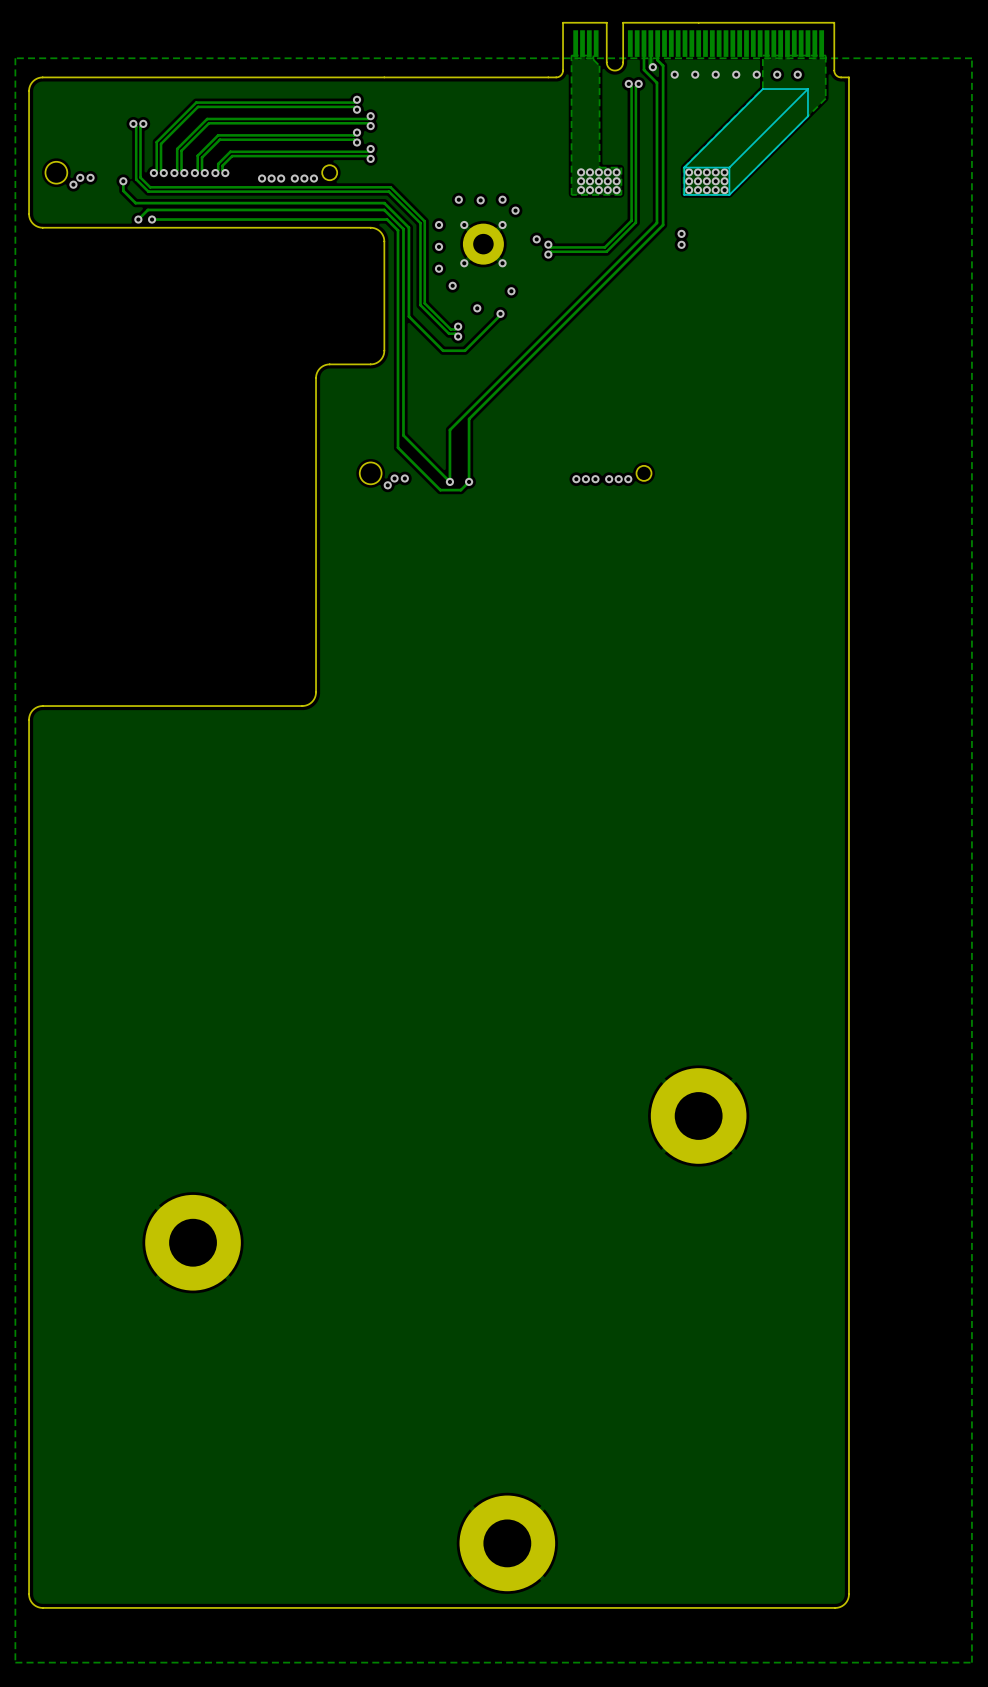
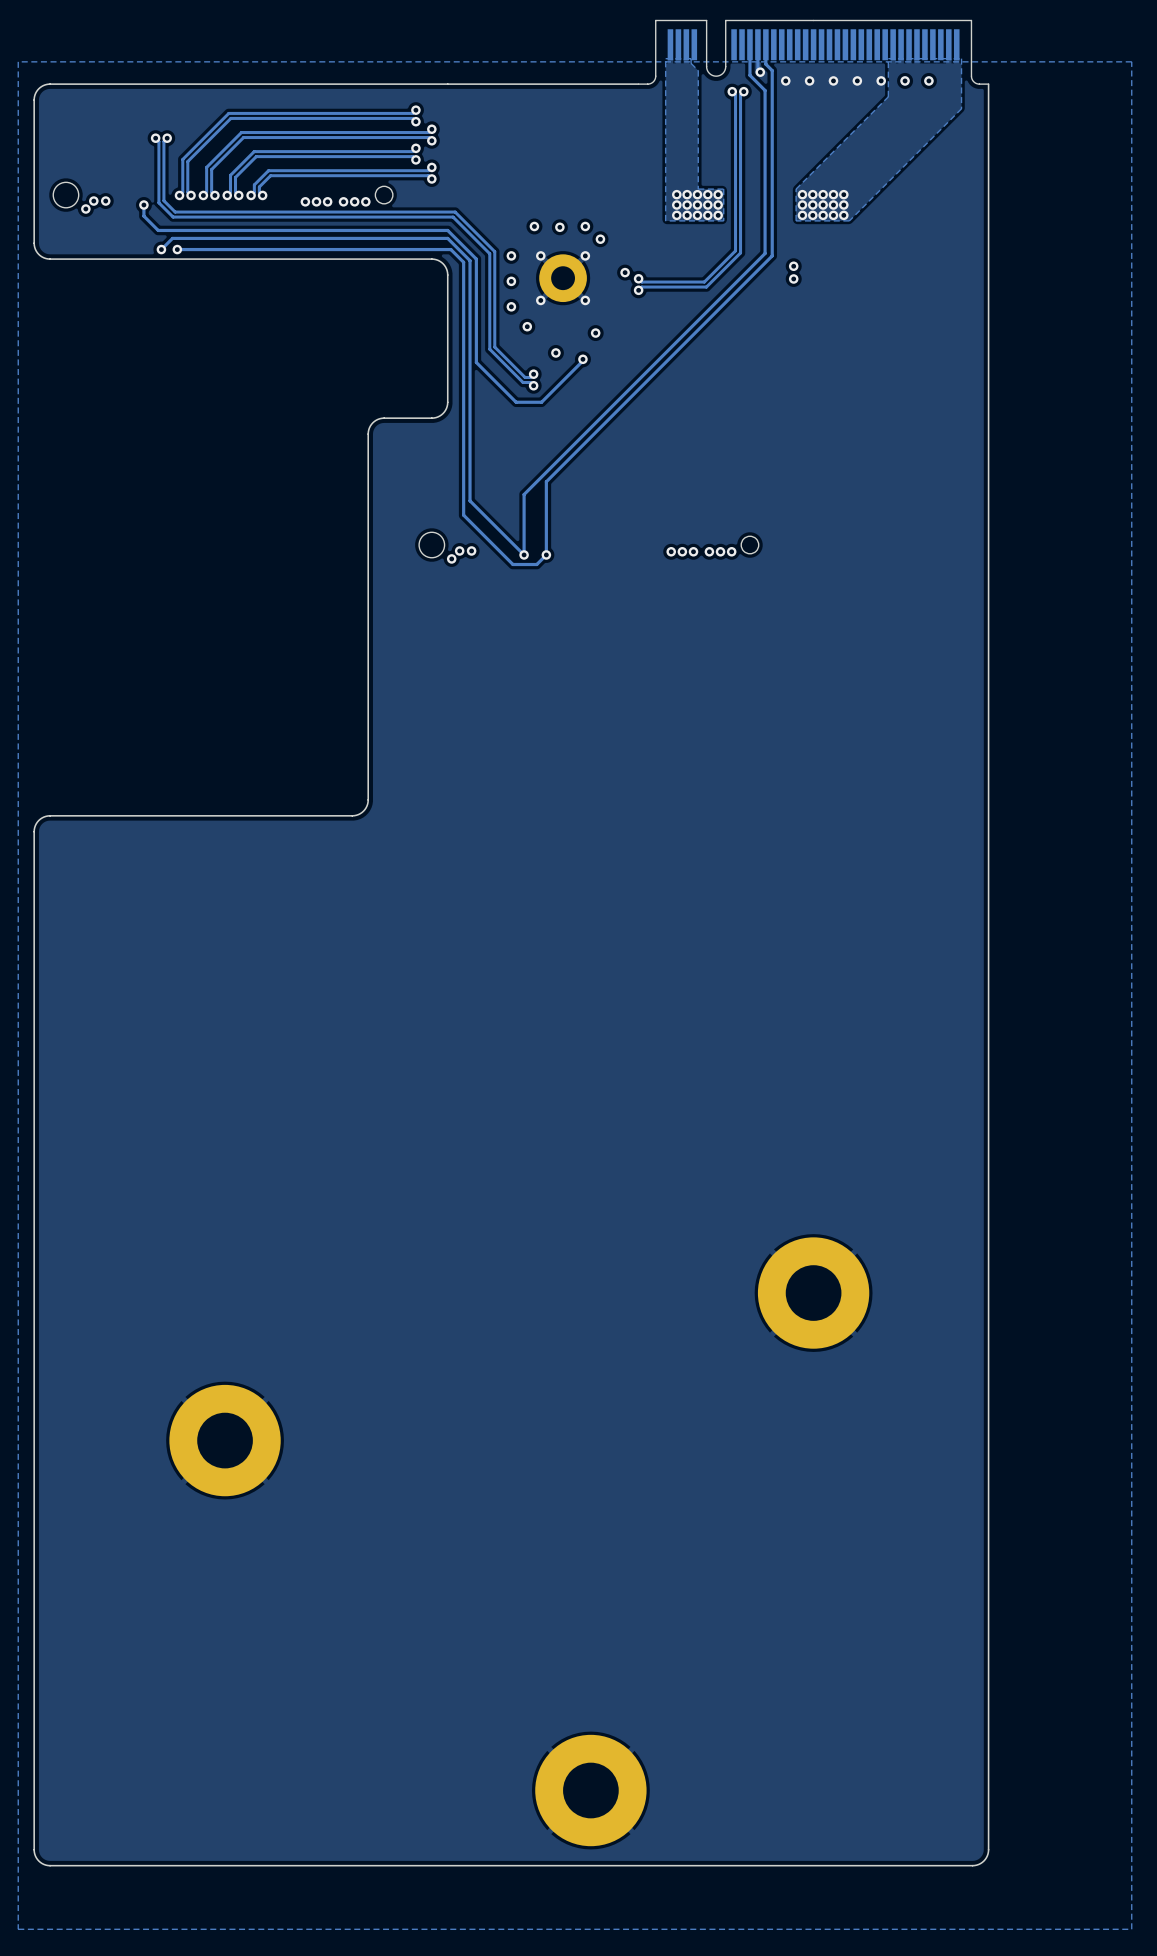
line: (807, 89) (807, 116) (729, 194) -> none
line: (807, 89) (729, 167) -> none
line: (807, 89) (762, 89) (684, 167) -> none
line: (684, 167) (684, 194) (729, 194) -> none
line: (729, 167) (684, 167) -> none
line: (729, 167) (729, 194) -> none

